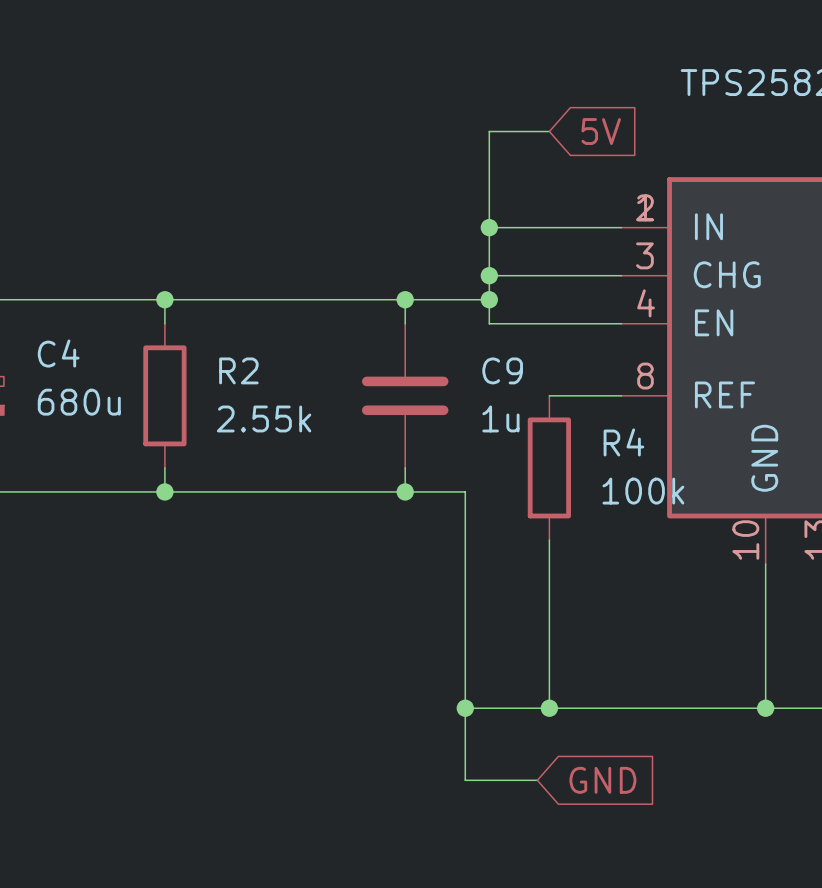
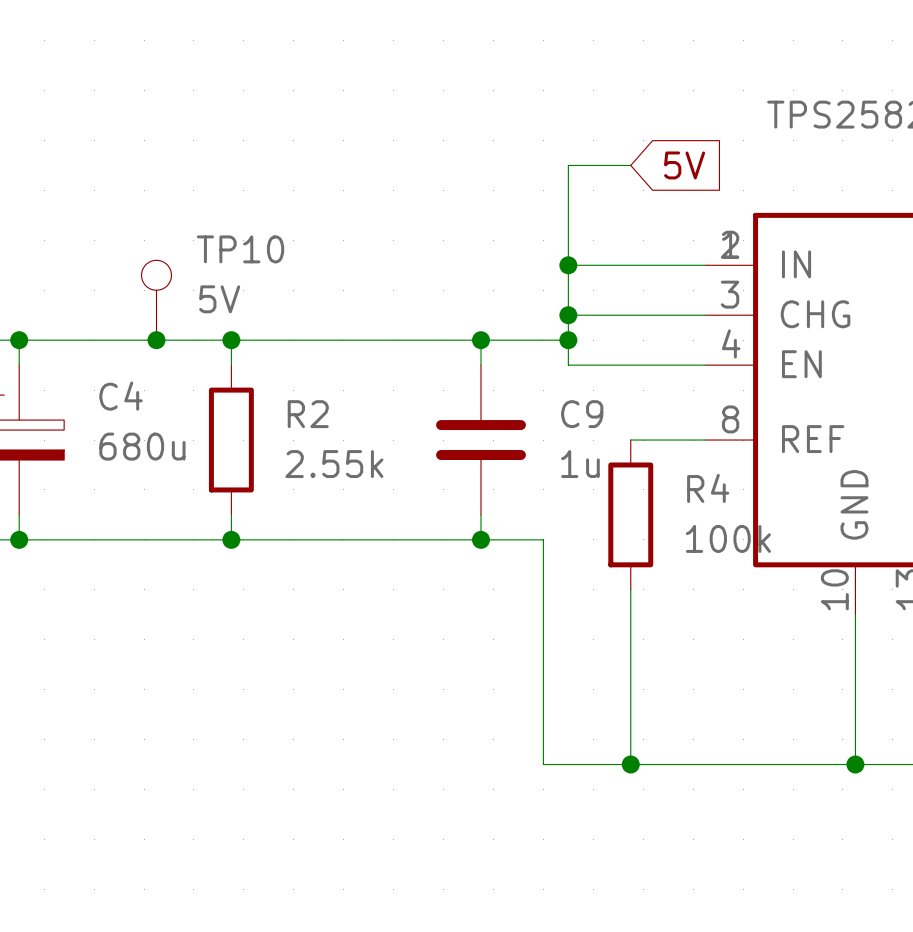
TP10: none -> 5V (156, 300)
junction: none -> (156, 340)
wire: (465, 708) (465, 780) (537, 780) -> none
junction: (465, 708) -> none
global label: GND (602, 780) -> none

